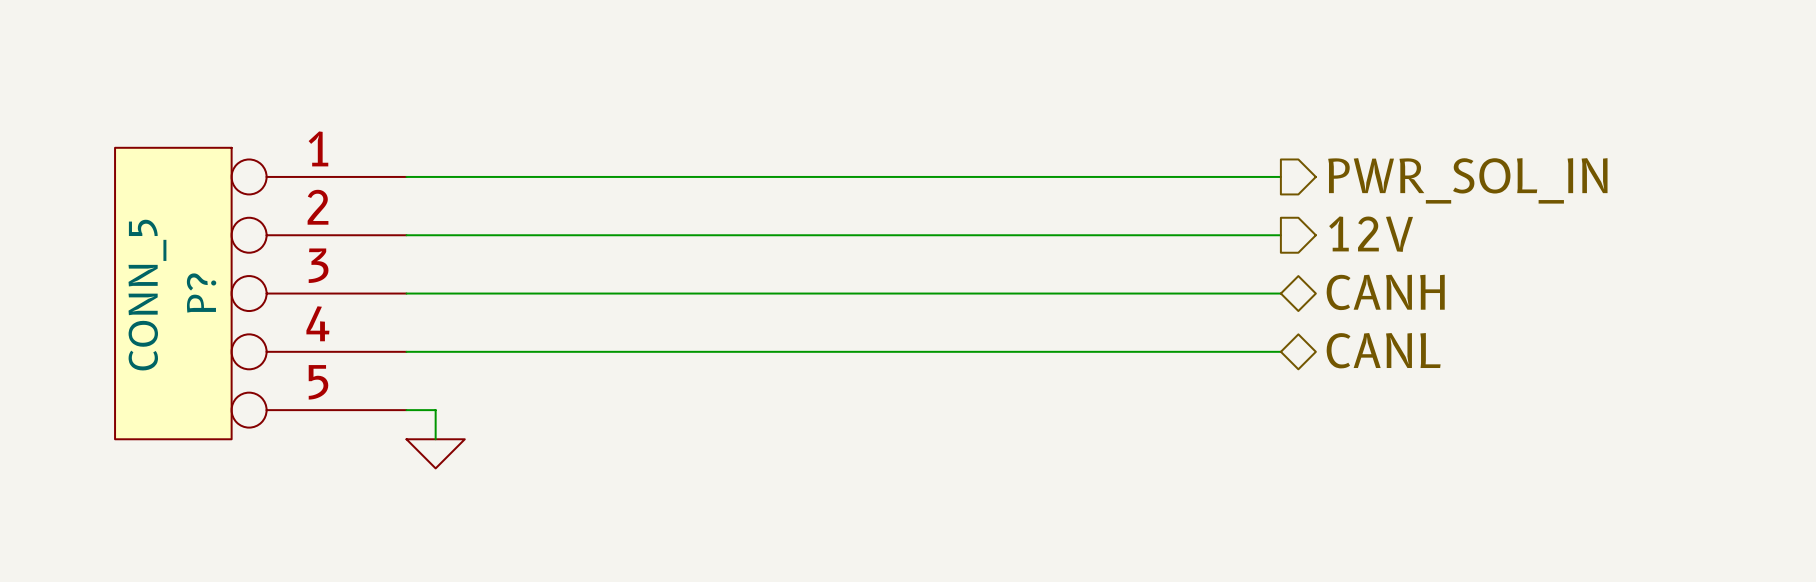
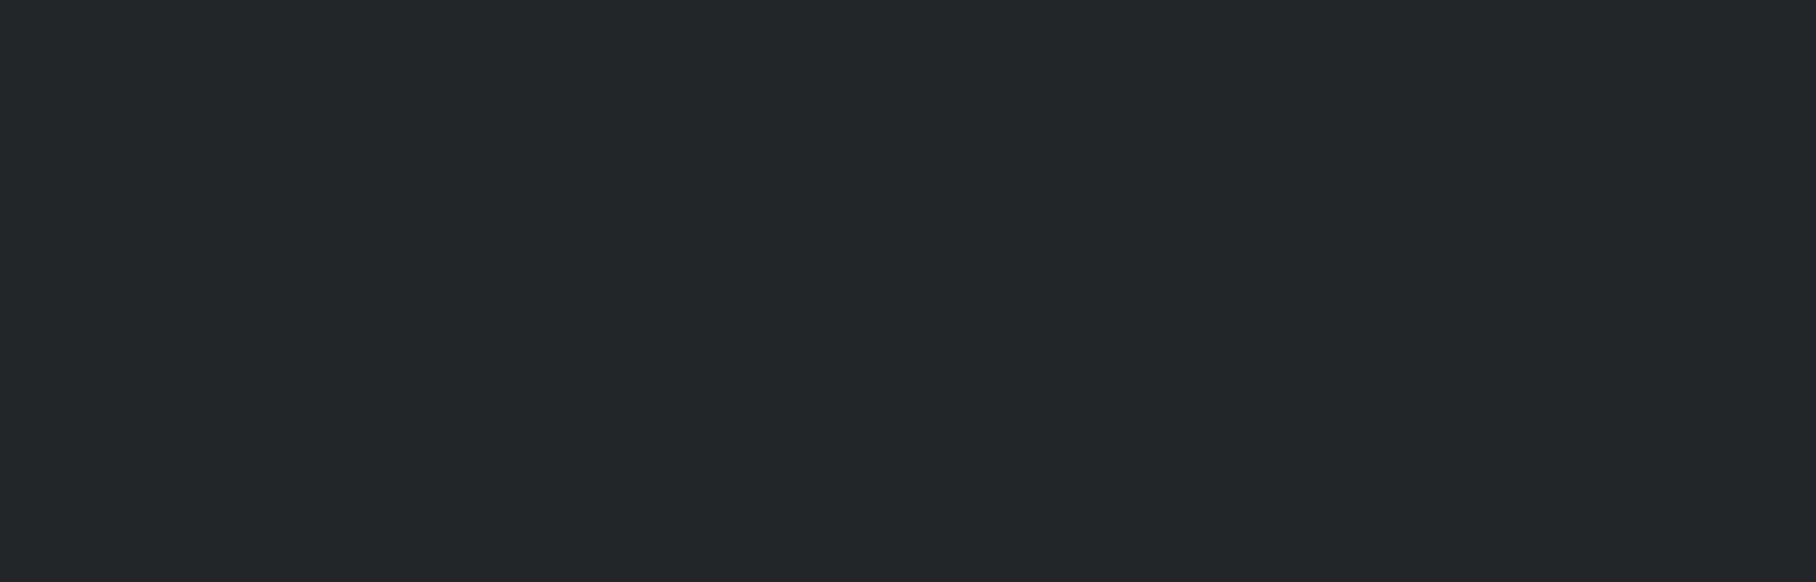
wire: (406, 176) (1280, 176) -> none
hierarchical label: PWR_SOL_IN (1467, 180) -> none
hierarchical label: 12V (1371, 234) -> none
wire: (406, 235) (1280, 235) -> none
hierarchical label: CANH (1385, 292) -> none
P?: CONN_5 (260, 293) -> none
wire: (406, 293) (1280, 293) -> none
hierarchical label: CANL (1383, 350) -> none
wire: (406, 351) (1280, 351) -> none
wire: (406, 410) (435, 410) (435, 439) -> none
power symbol: (435, 453) -> none

